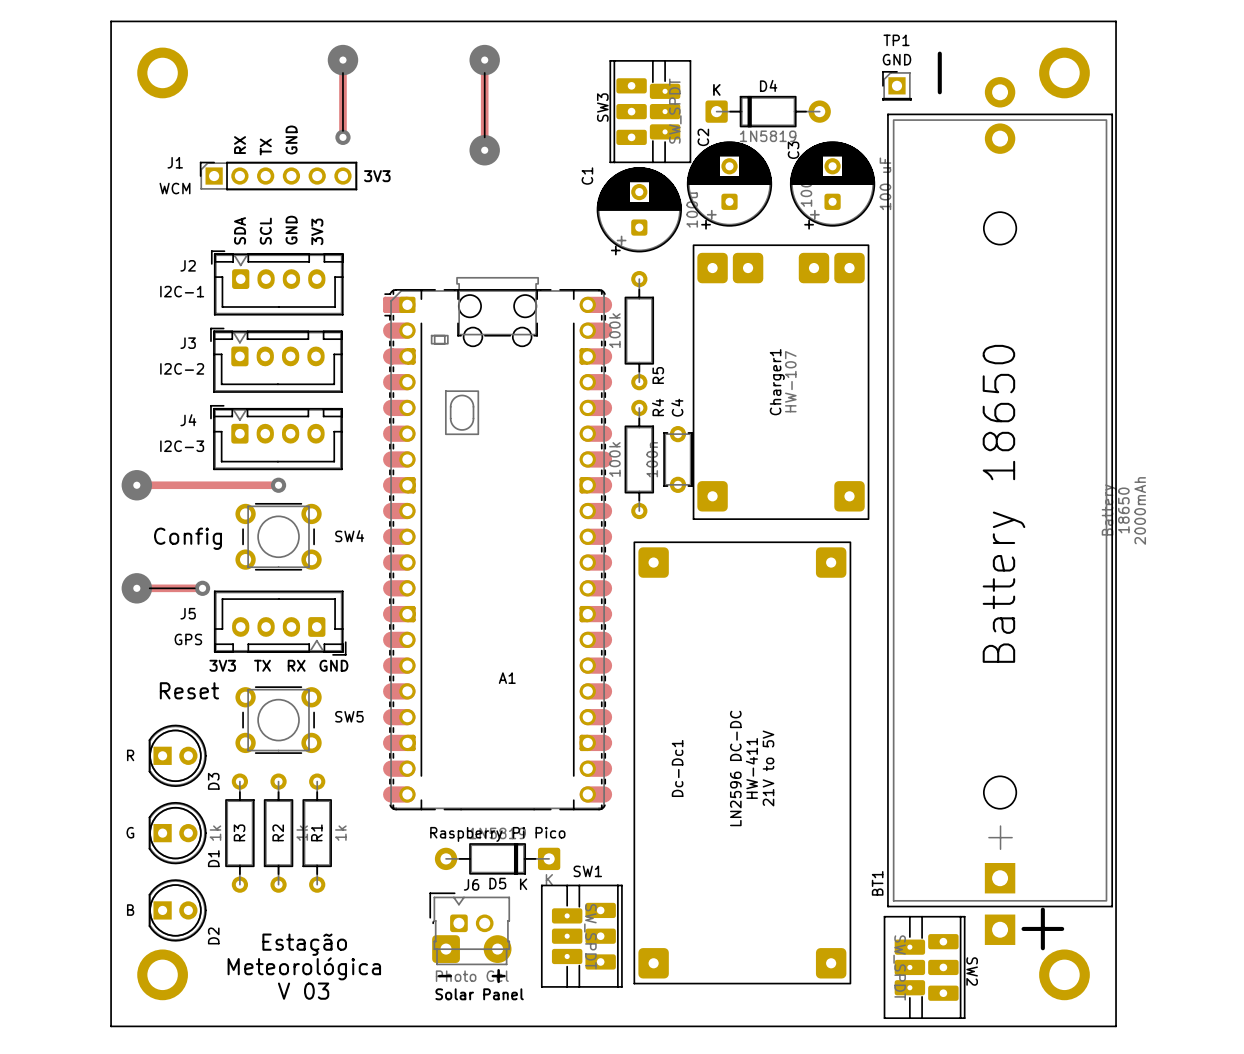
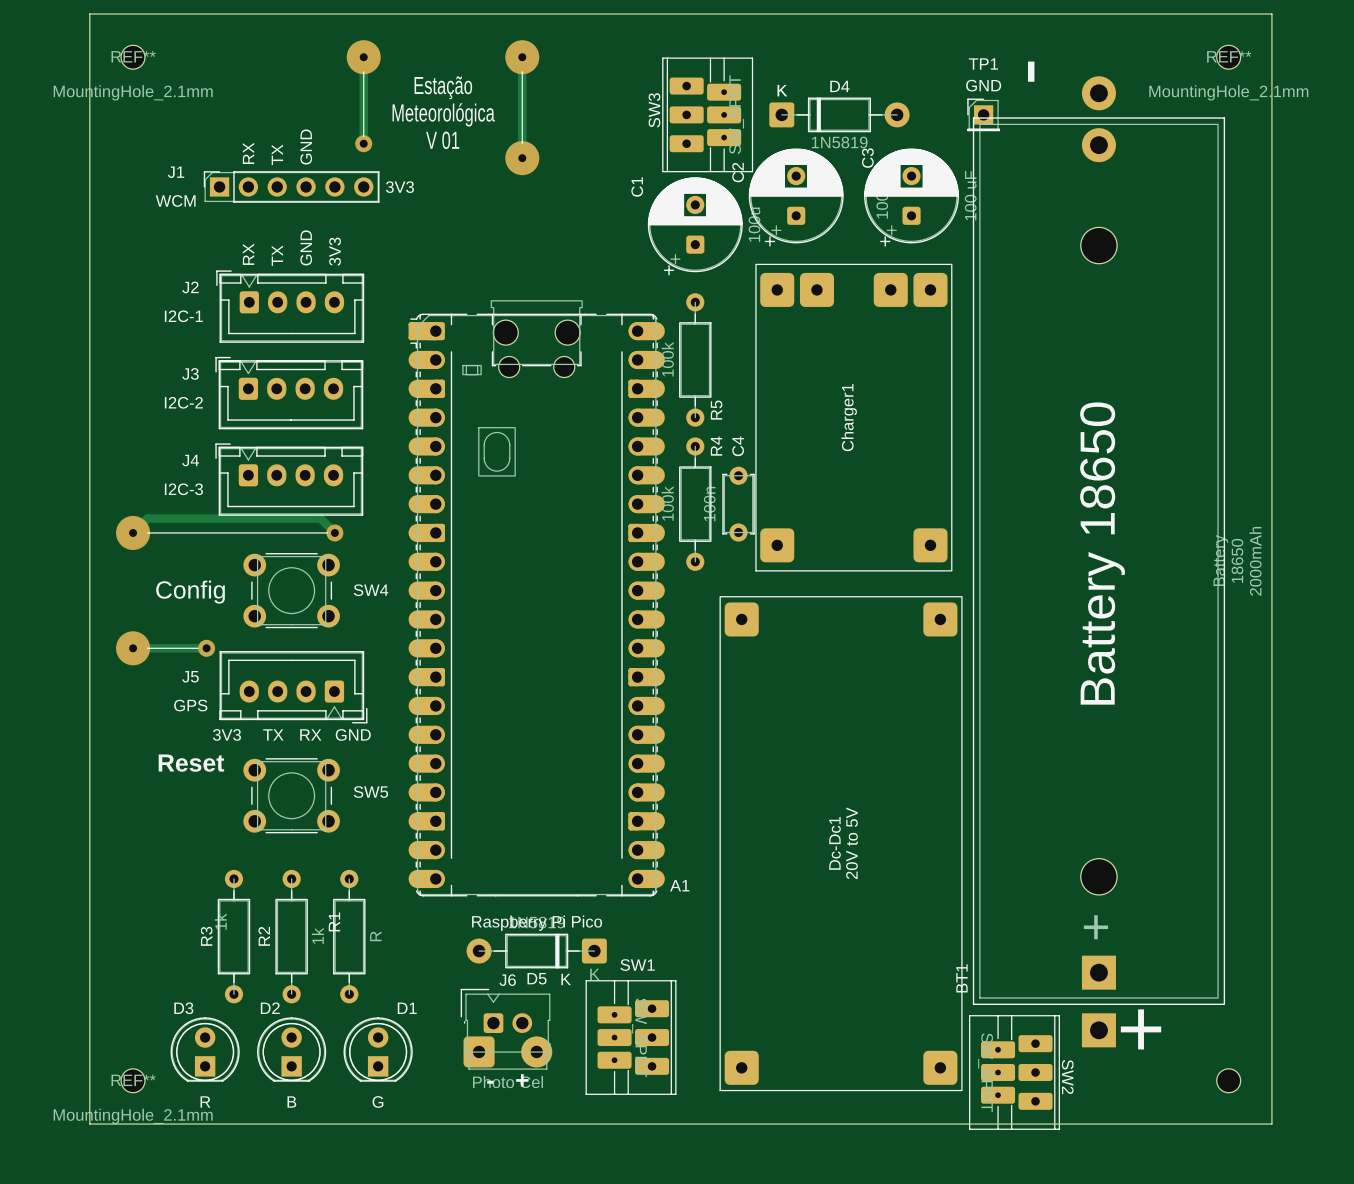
board edge: (111, 21) (111, 1026) (1116, 1026) (1116, 21) -> (104, 13) (89, 13) (89, 1124) (1271, 1124) (1271, 13) (1228, 13)
REF**: none -> MountingHole_2.1mm (133, 57)
REF**: none -> MountingHole_2.1mm (1228, 57)
part: (162, 72) -> none
part: (1064, 72) -> none
TP1 position: (896, 85) -> (983, 114)
text: none -> Estação (443, 87)
text: none -> Meteorológica (443, 114)
text: none -> V 01 (442, 140)
C2 name position: C2 (703, 137) -> C2 (738, 172)
text: SDA (240, 230) -> RX (248, 254)
text: SCL (265, 231) -> TX (277, 255)
Charger1 value: HW-107 (790, 381) -> none
track: (136, 485) (278, 485) -> (133, 532) (147, 518) (320, 518) (334, 532)
line: none -> (147, 532) (327, 532)
via position: (278, 485) -> (334, 532)
A1 name position: A1 (507, 678) -> A1 (679, 885)
D3 rotation: 0° (177, 755) -> 90° counterclockwise (205, 1049)
D3 position: (177, 755) -> (205, 1049)
Dc-Dc1 position: (742, 762) -> (841, 843)
Dc-Dc1 value: none -> 20V to 5V (851, 843)
Dc-Dc1 name position: Dc-Dc1 (677, 768) -> Dc-Dc1 (835, 843)
Dc-Dc1 text: LN2596 DC-DC (735, 768) -> none
Dc-Dc1 text: HW-411 (751, 768) -> none
Dc-Dc1 text: 21V to 5V (768, 768) -> none
D3 name position: D3 (213, 781) -> D3 (183, 1008)
R3 name position: R3 (239, 832) -> R3 (206, 936)
R2 name position: R2 (278, 832) -> R2 (264, 936)
D1 rotation: 0° (177, 833) -> 90° counterclockwise (378, 1049)
D1 position: (177, 833) -> (378, 1049)
R3 position: (239, 833) -> (233, 936)
R2 position: (278, 833) -> (291, 936)
R1 position: (317, 833) -> (349, 936)
R1 value: 1k (340, 833) -> R (375, 936)
D2 rotation: 0° (177, 910) -> 90° counterclockwise (291, 1049)
D2 position: (177, 910) -> (291, 1049)
D2 name position: D2 (213, 935) -> D2 (270, 1008)
text: Estação (304, 944) -> none
text: Meteorológica (304, 968) -> none
REF**: none -> MountingHole_2.1mm (133, 1080)
part: (162, 974) -> none
part: (1064, 974) -> none
part: none -> (1228, 1080)
text: V 03 (303, 991) -> none
text: Solar Panel (479, 994) -> none

